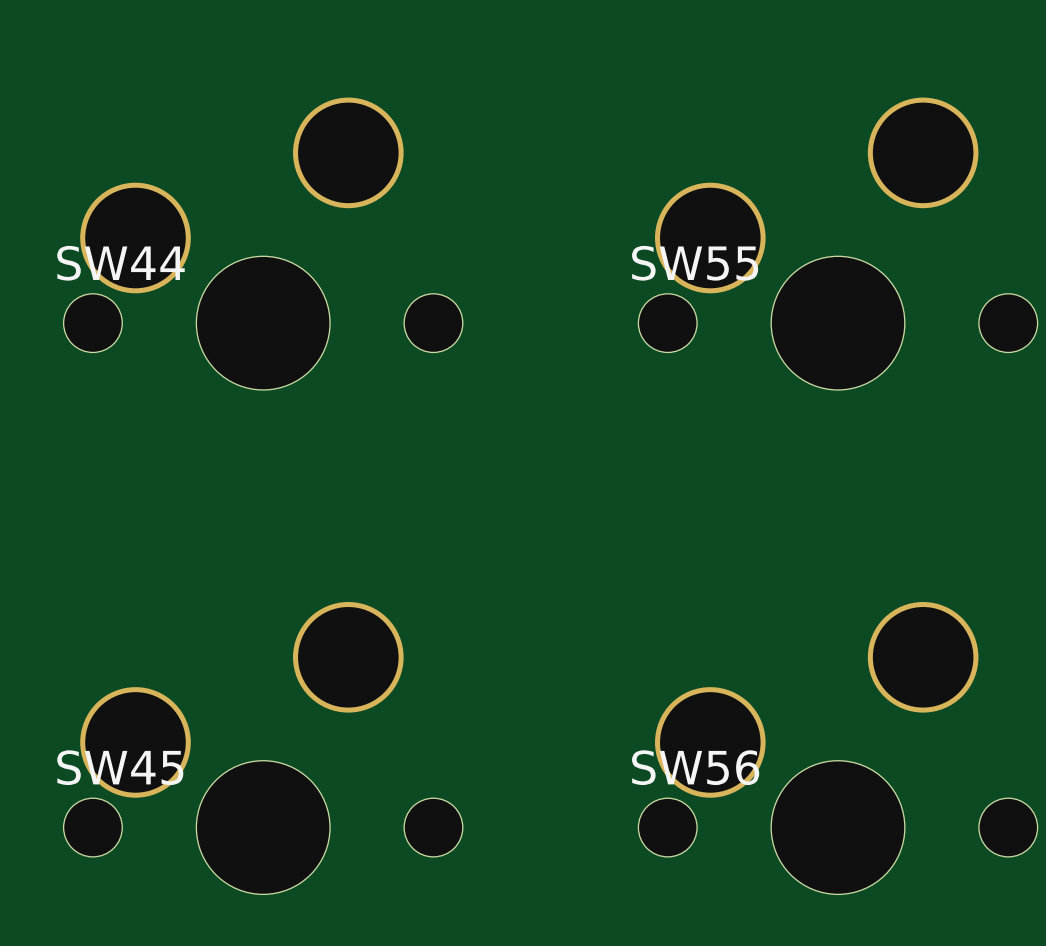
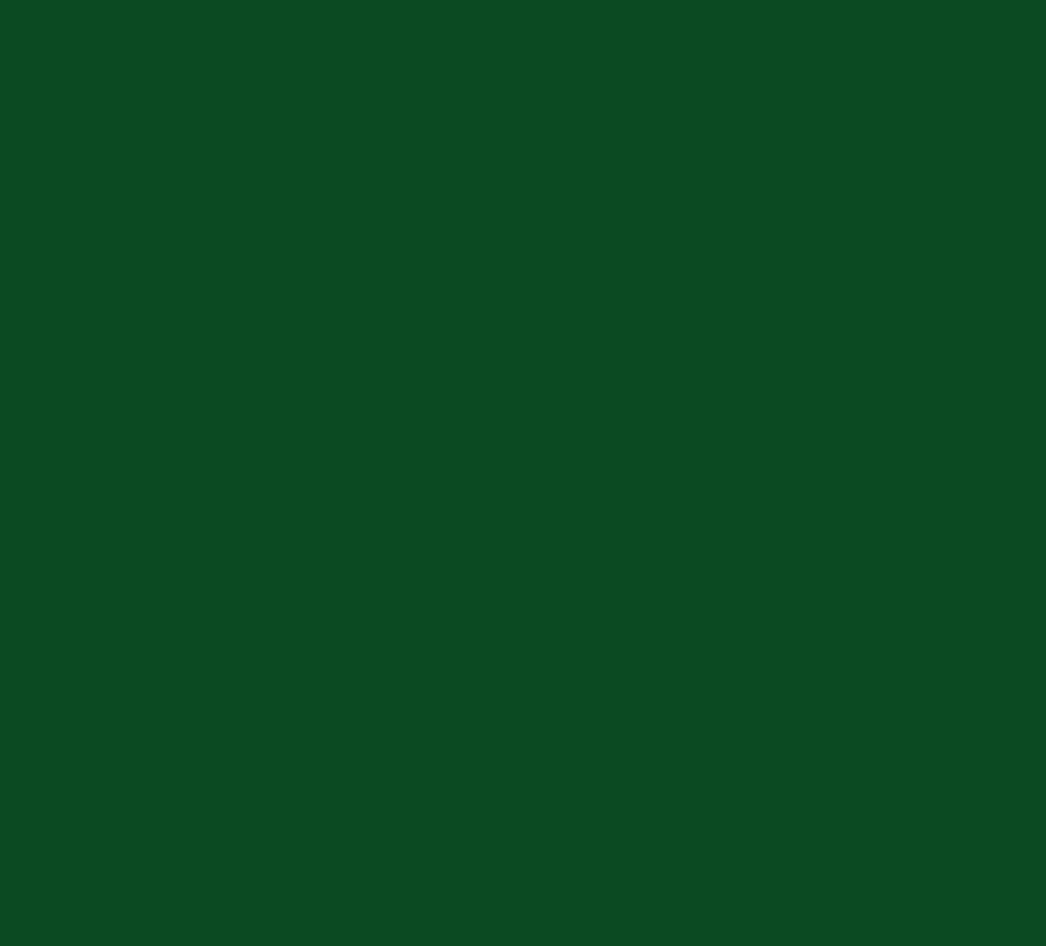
SW44: (263, 243) -> none
SW55: (838, 243) -> none
SW45: (263, 748) -> none
SW56: (838, 748) -> none

